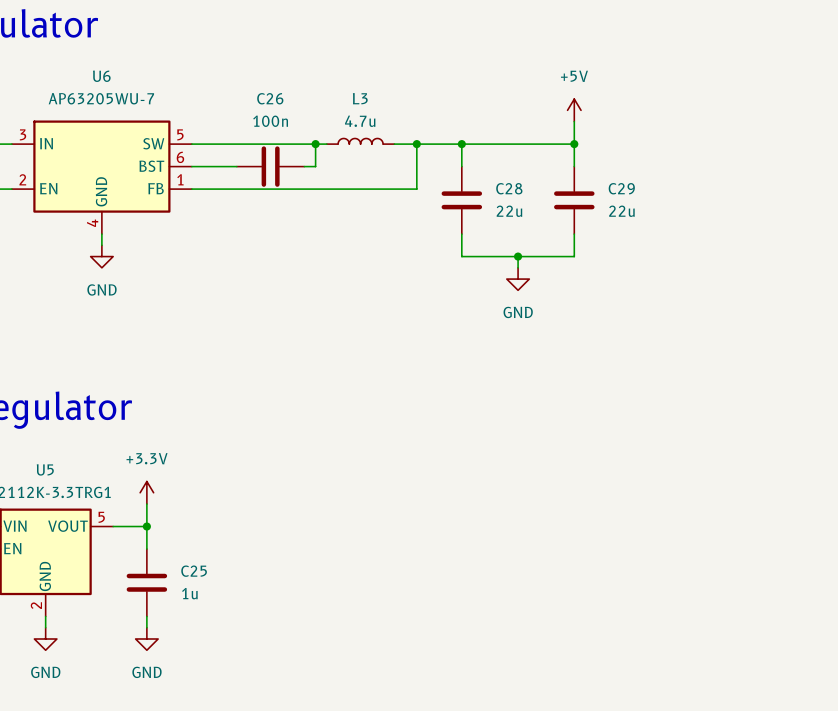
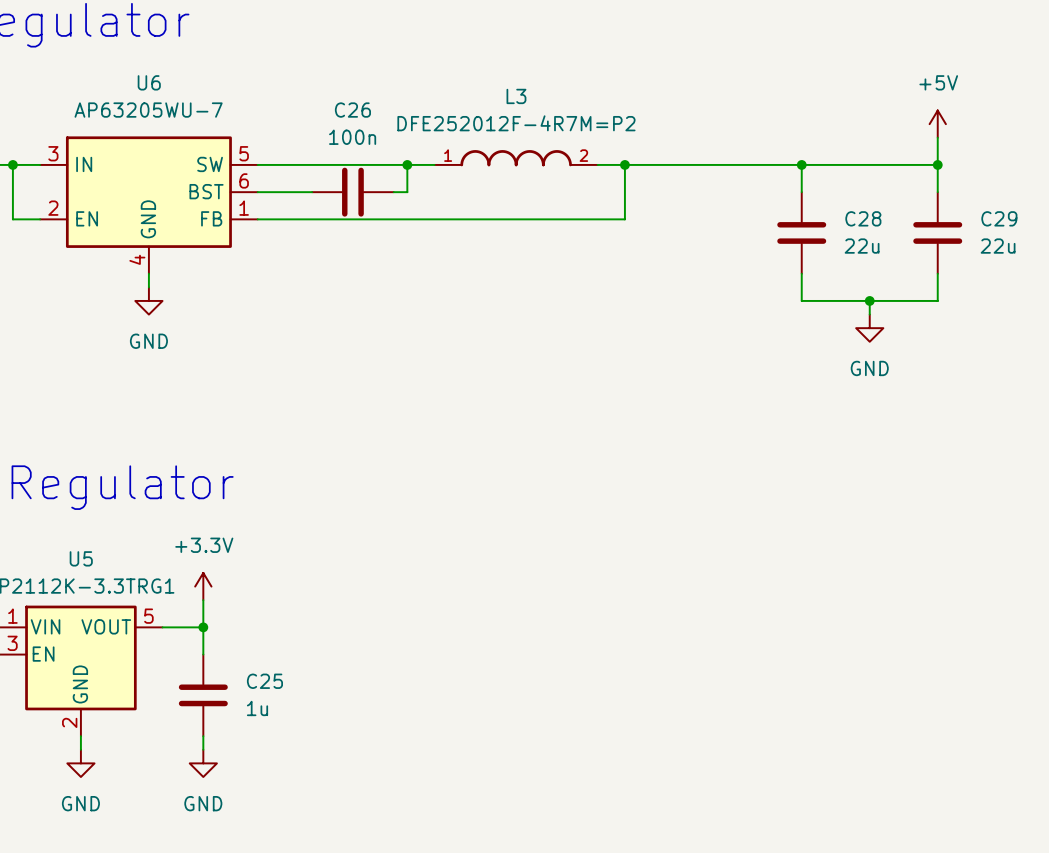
power symbol position: +5V (574, 110) -> +5V (937, 124)
L3 value: 4.7u (360, 121) -> DFE252012F-4R7M=P2 (516, 123)
wire: (574, 121) (574, 166) -> (937, 137) (937, 192)
L3 symbol: [326, 138, 395, 145] -> [434, 150, 598, 167]
wire: (394, 144) (473, 144) -> none
wire: (416, 144) (416, 189) -> (624, 164) (624, 219) (529, 219)
junction: (416, 144) -> none
wire: (461, 144) (461, 166) -> (801, 164) (801, 192)
junction position: (461, 144) -> (624, 164)
wire: none -> (720, 164) (937, 164)
junction: (574, 144) -> none
junction: none -> (801, 164)
junction: none -> (937, 164)
C28 position: (461, 200) -> (801, 232)
C29 position: (574, 200) -> (937, 232)
wire: (461, 234) (461, 256) (574, 256) (574, 234) -> (801, 273) (801, 300) (937, 300) (937, 273)
wire: (518, 256) (518, 267) -> (869, 300) (869, 314)
junction: (518, 256) -> none
junction: none -> (869, 300)
power symbol position: GND (518, 279) -> GND (869, 328)

